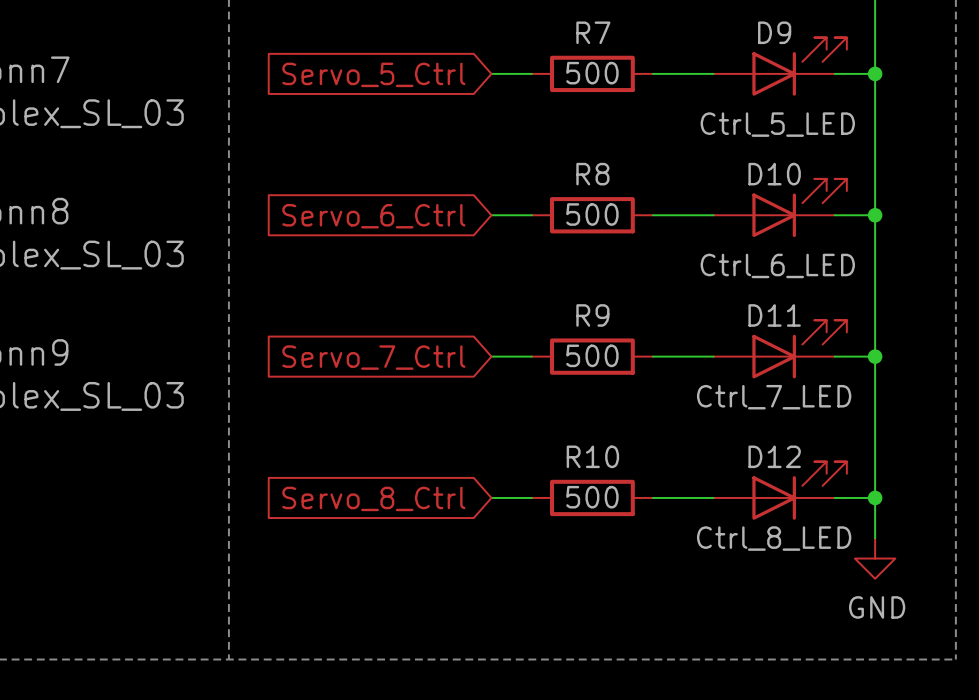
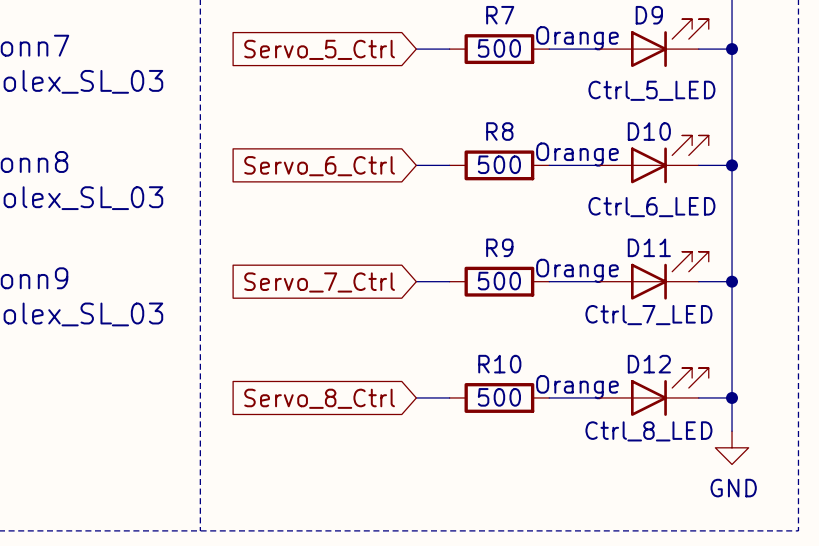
text: none -> Orange (577, 38)
text: none -> Orange (577, 154)
text: none -> Orange (577, 270)
text: none -> Orange (577, 387)

